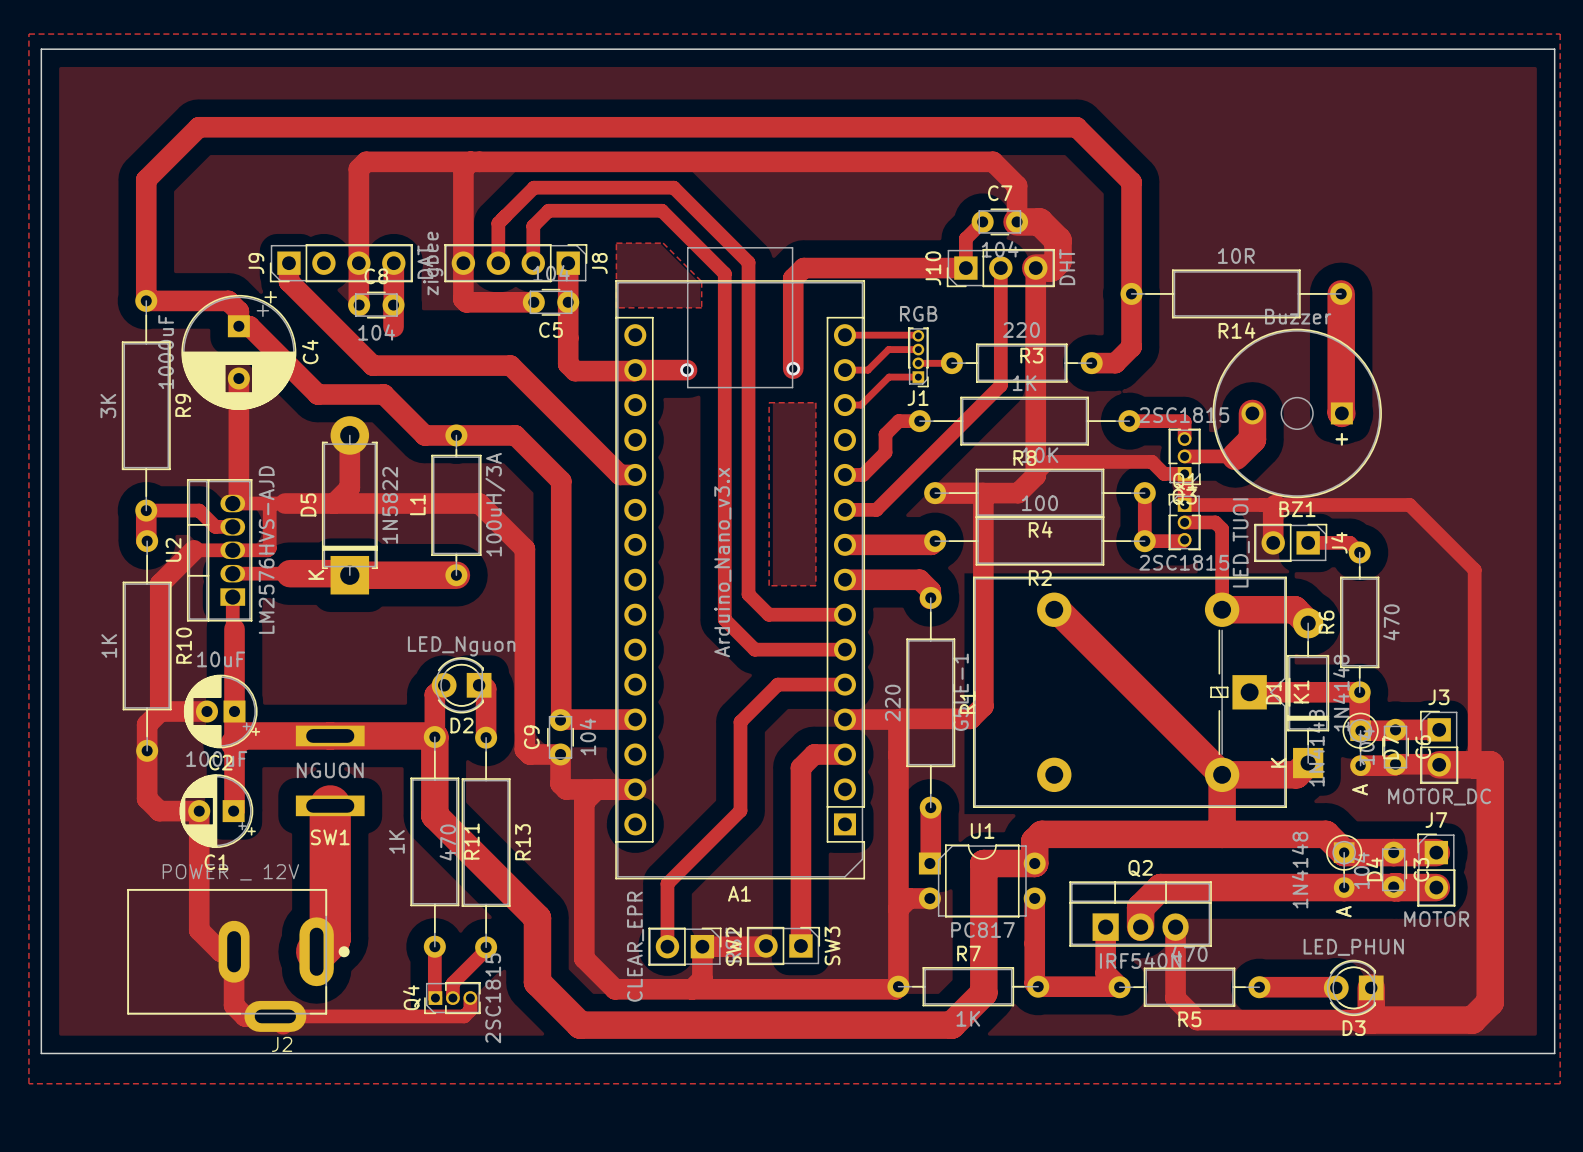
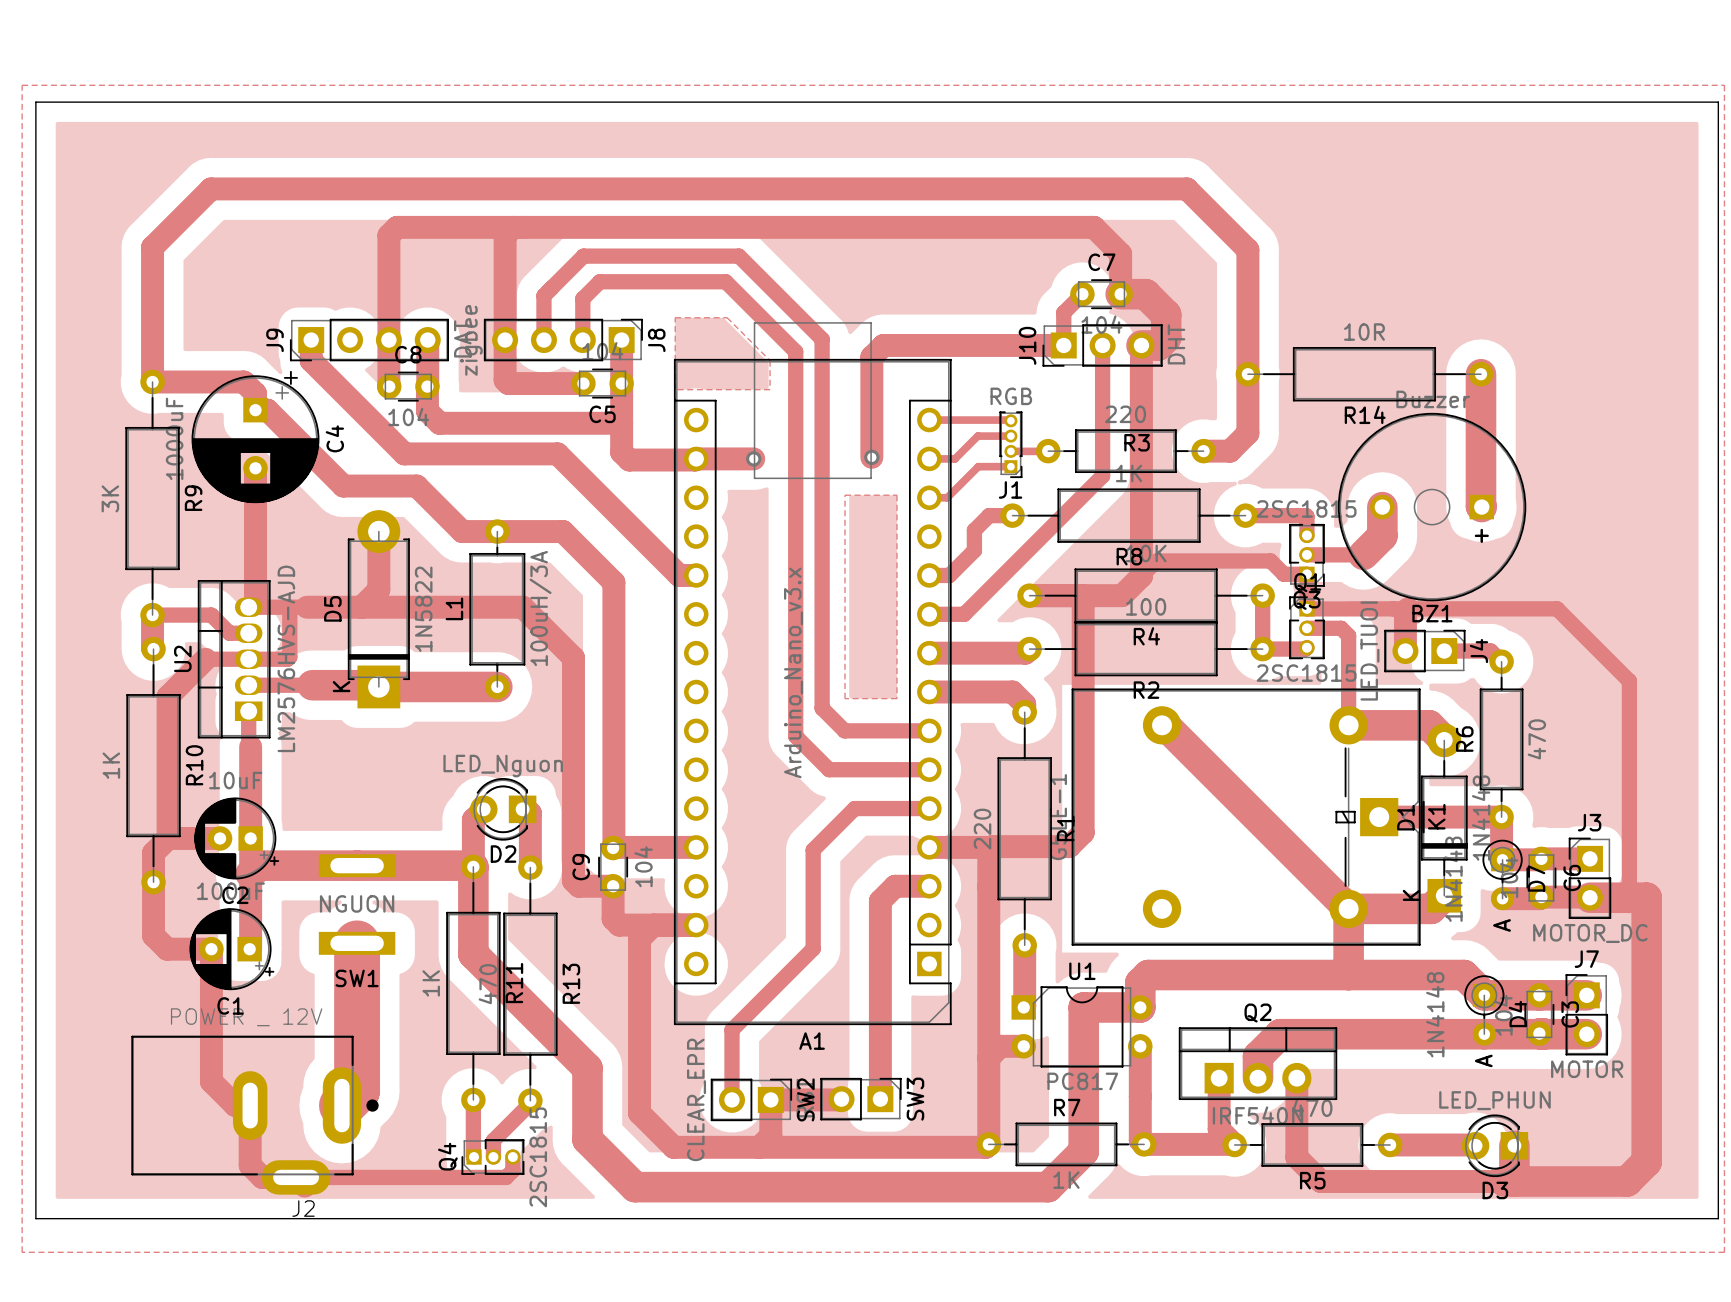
track: none -> (427, 411) (439, 423) (621, 423)

